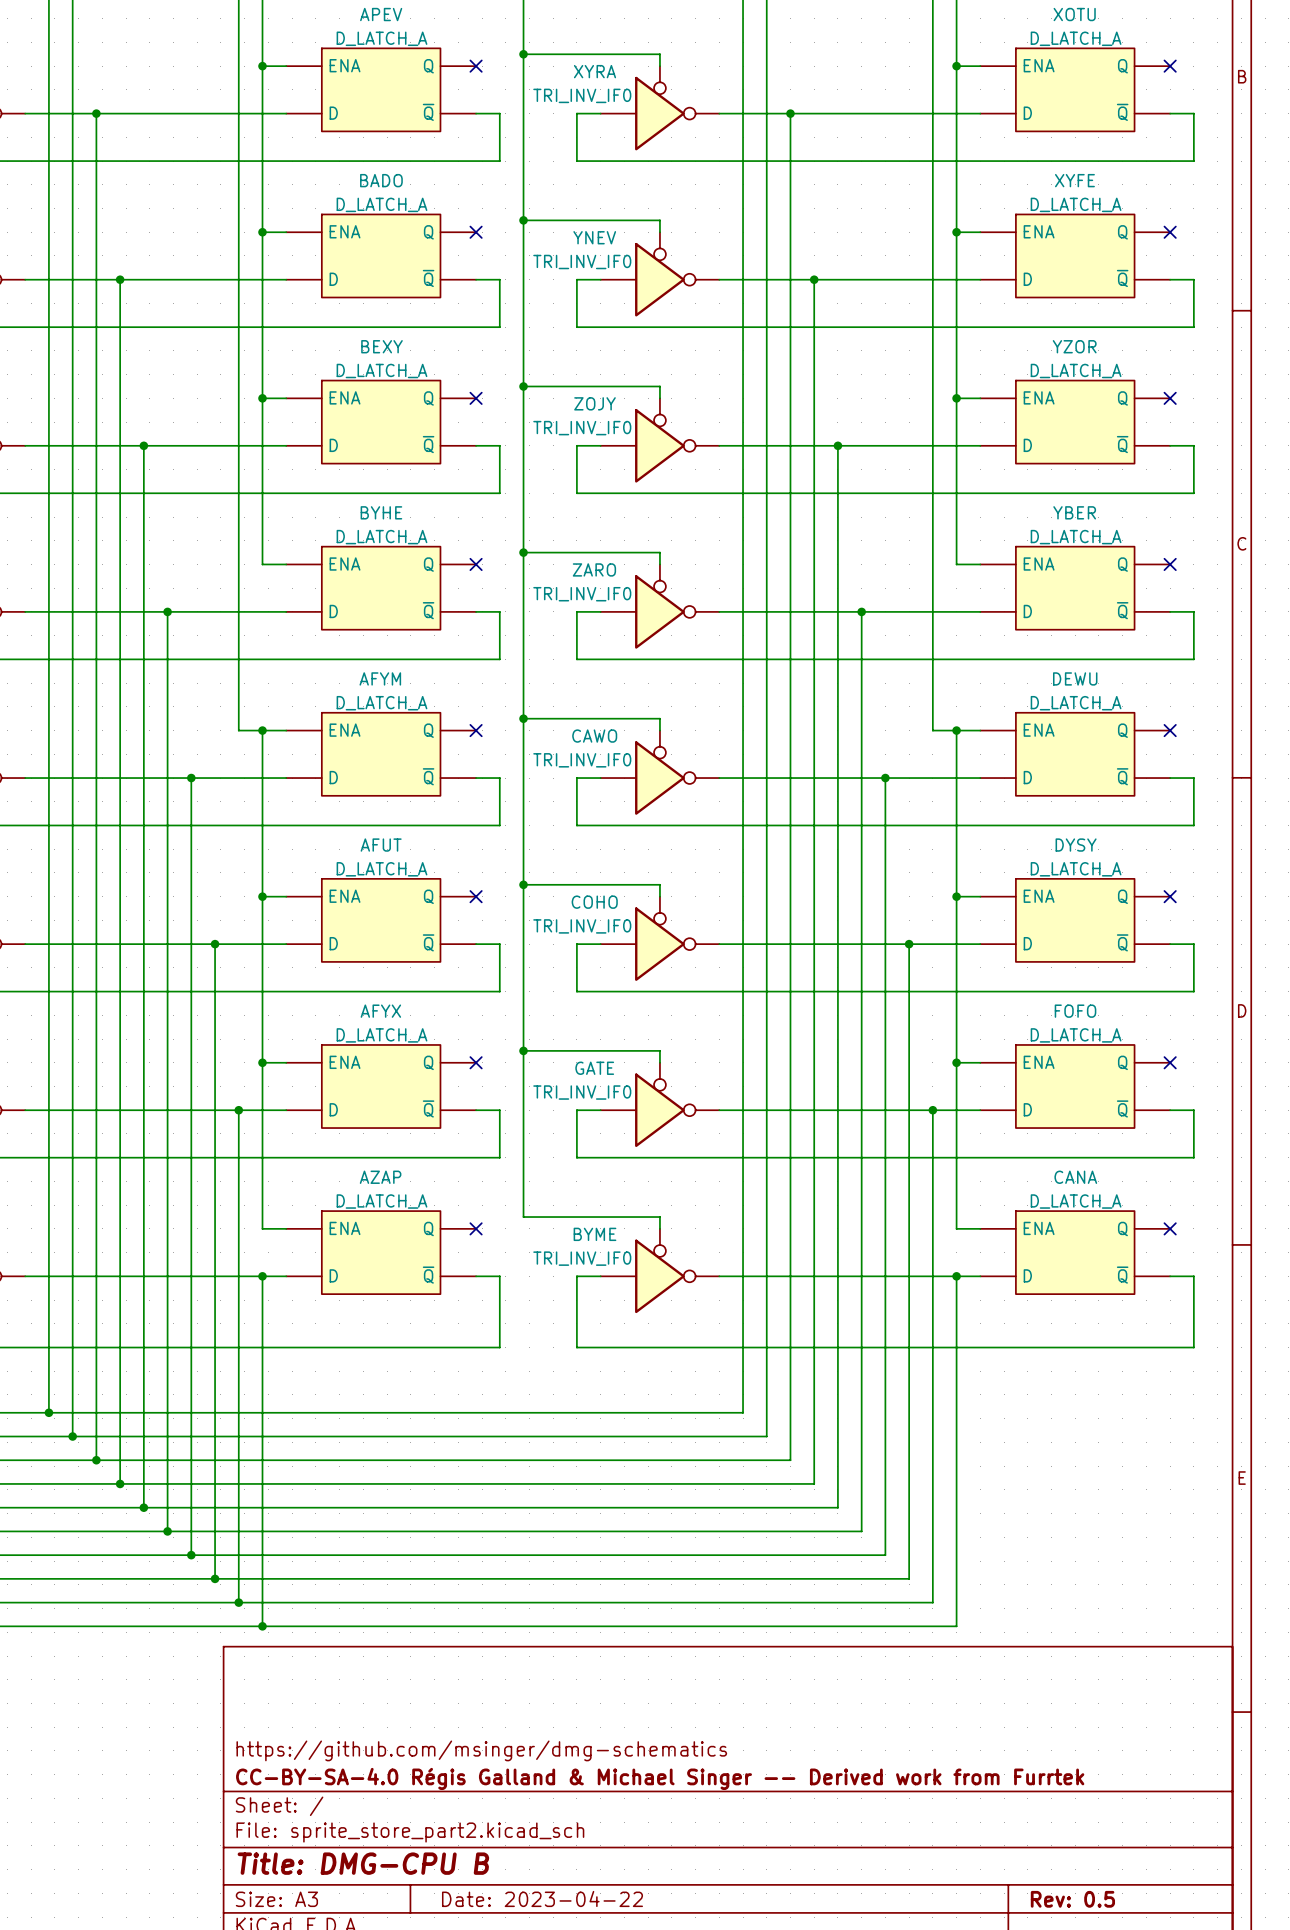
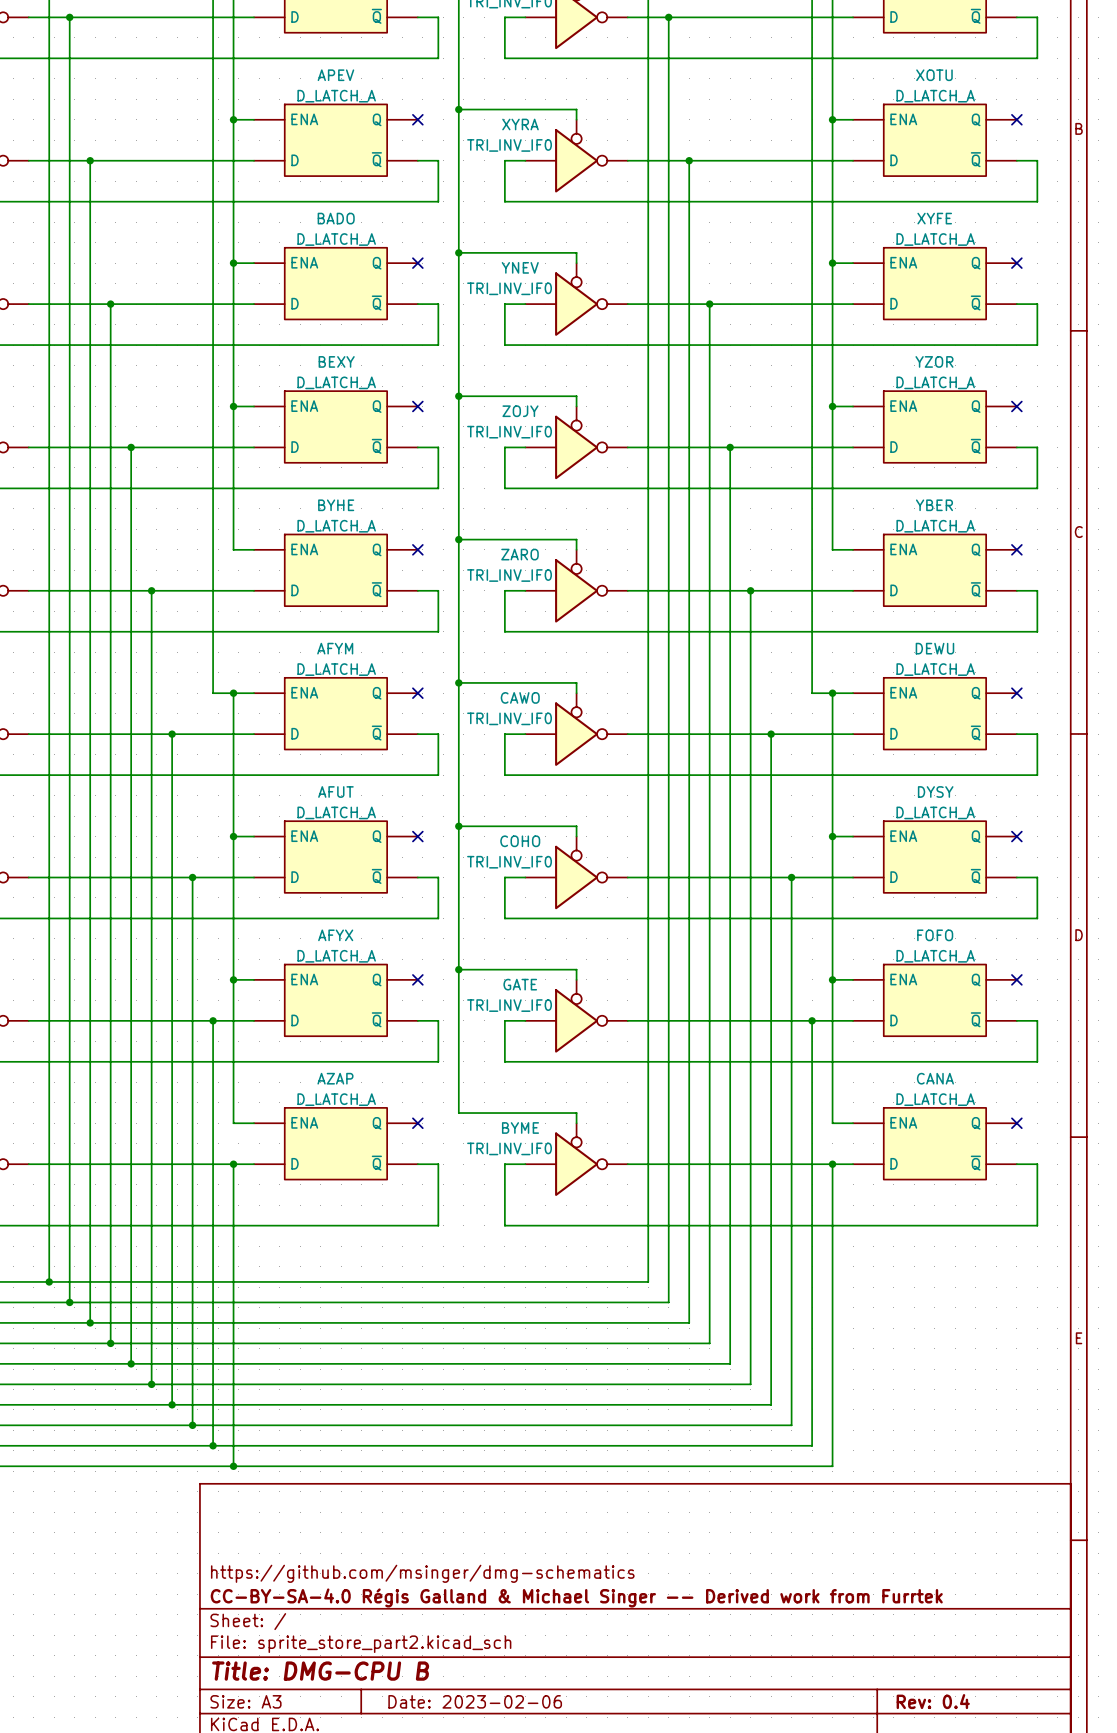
title block: Date: 2023-04-22 (542, 1898) -> Date: 2023-02-06 (475, 1701)
title block: Rev: 0.5 (1072, 1899) -> Rev: 0.4 (933, 1701)

